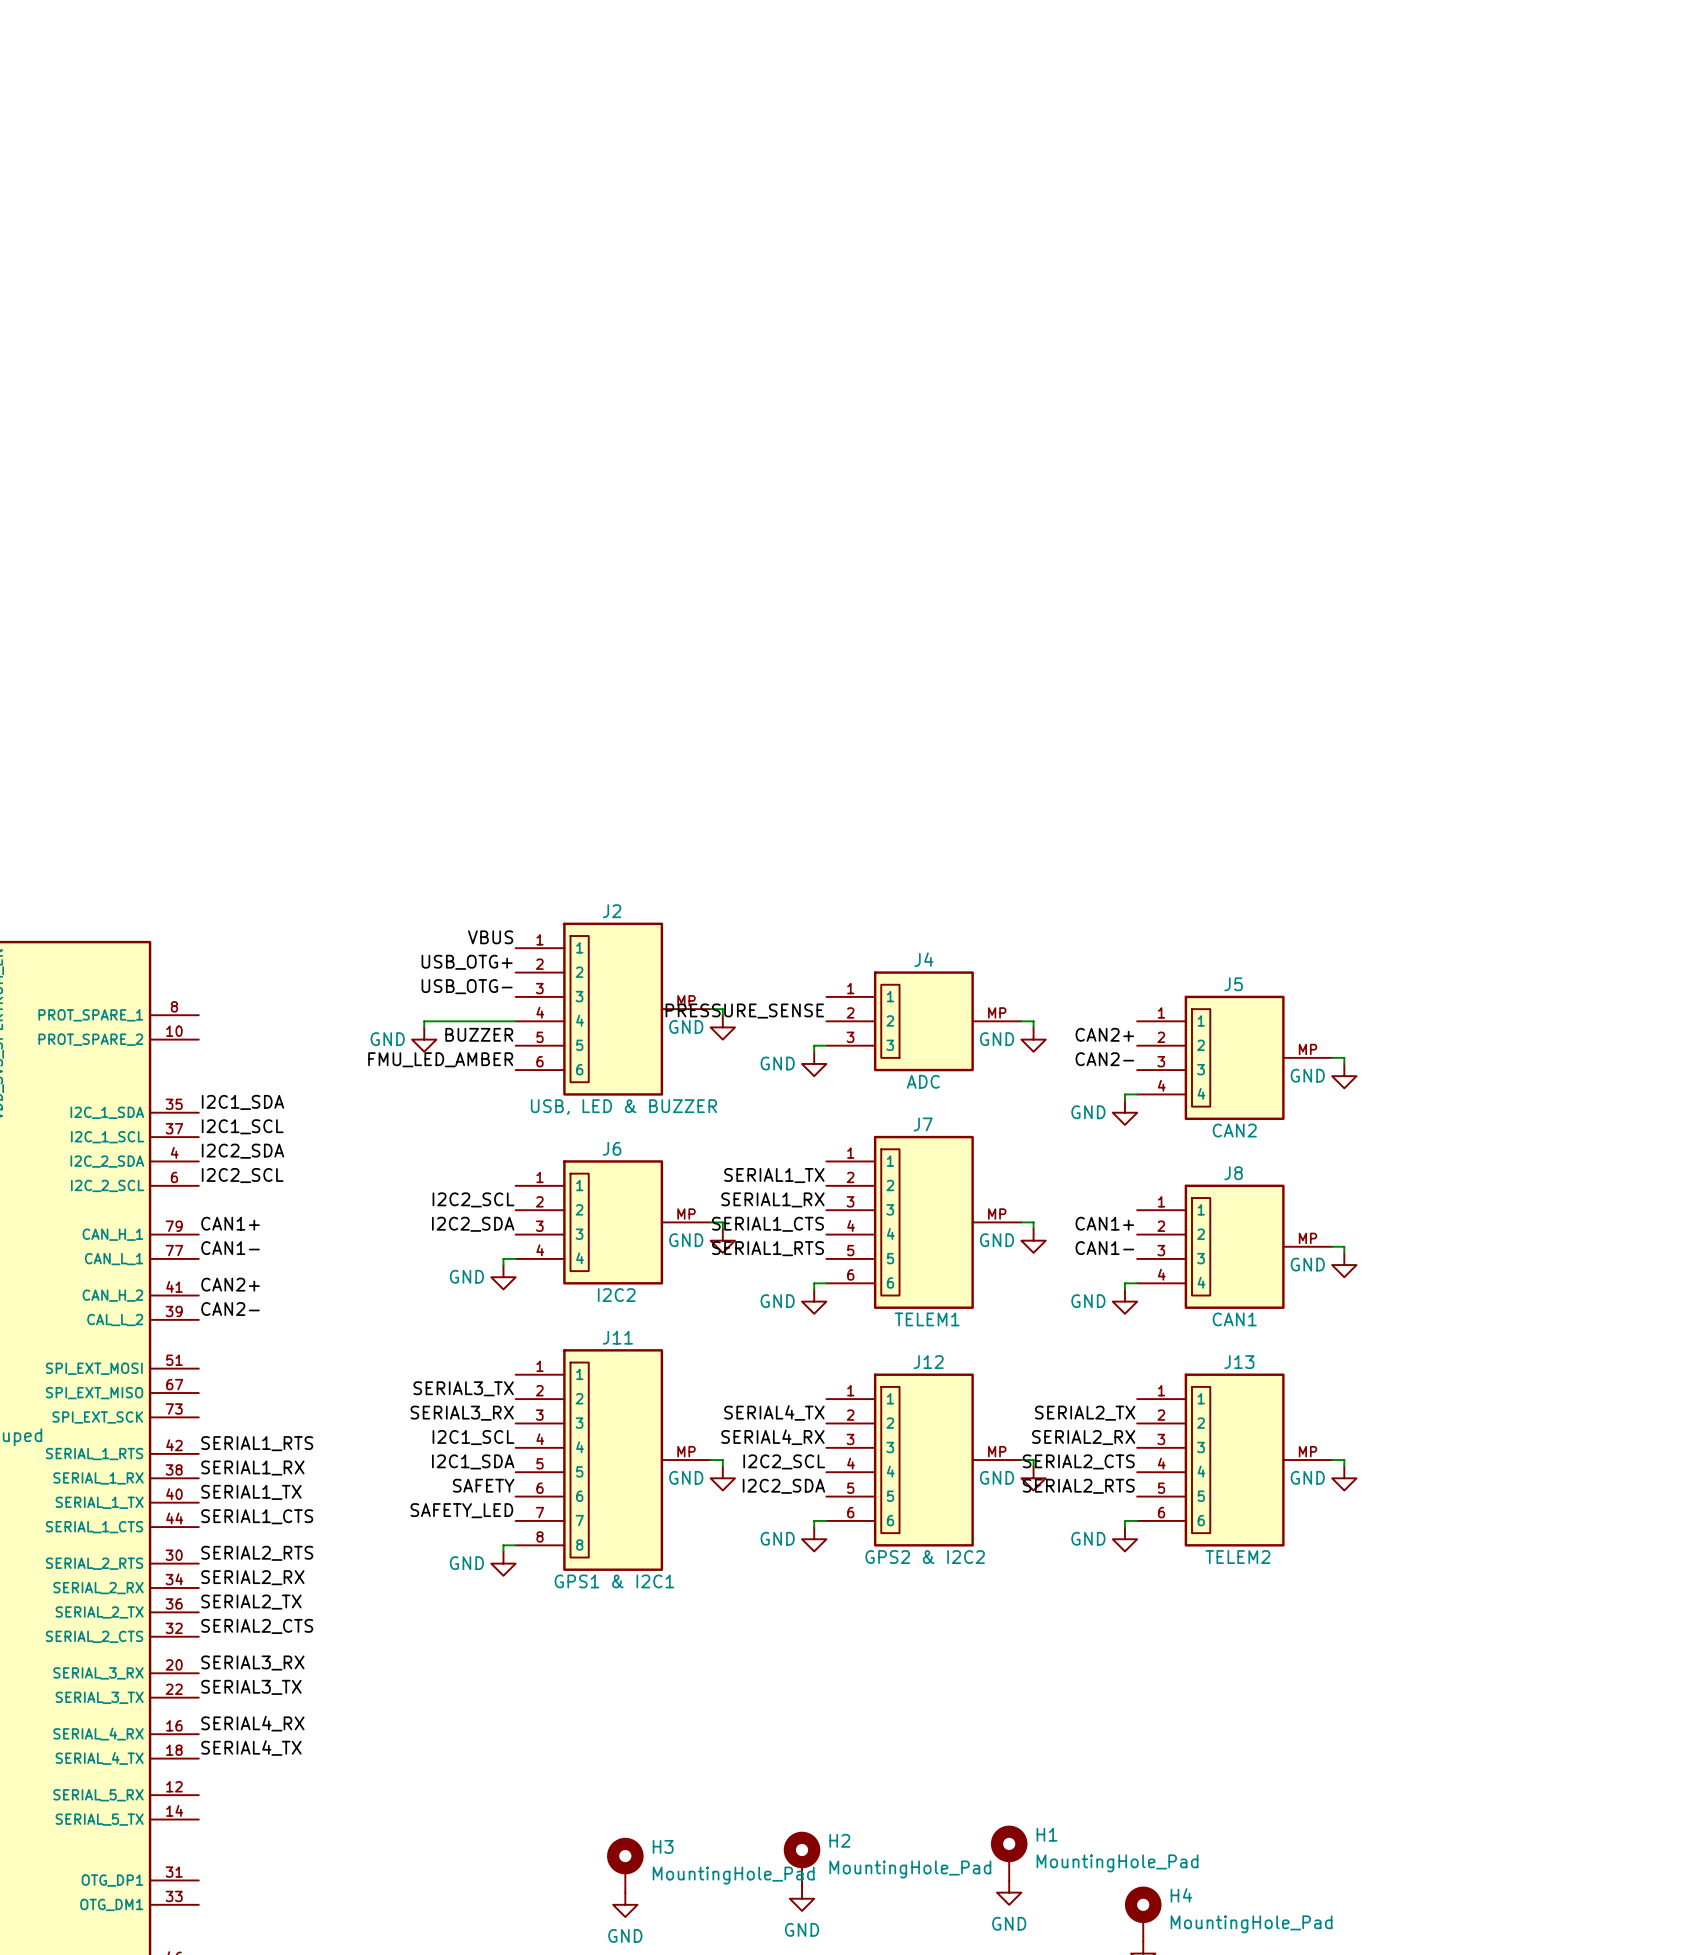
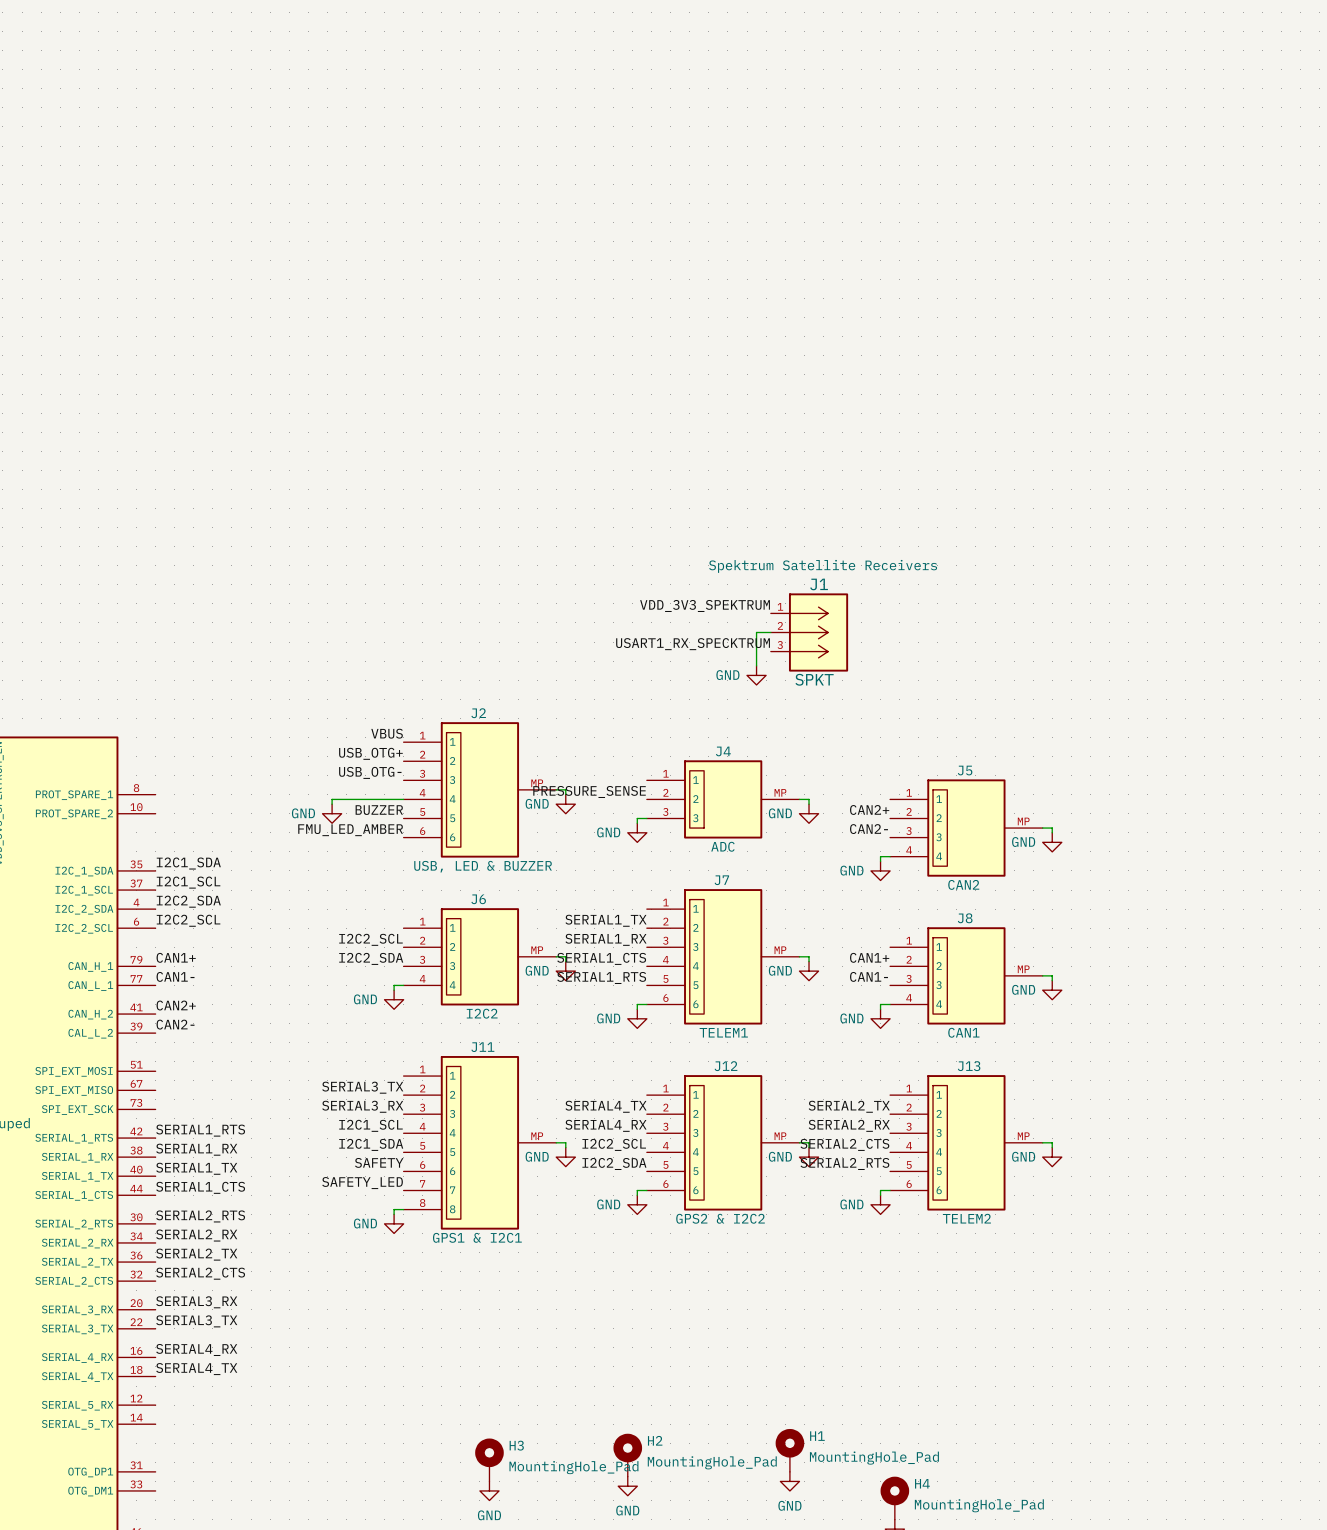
label: none -> VDD_3V3_SPEKTRUM (705, 605)
wire: none -> (770, 632) (756, 632) (756, 665)
J1: none -> SPKT (809, 632)
label: none -> USART1_RX_SPECKTRUM (693, 644)
power symbol: none -> GND (756, 675)

